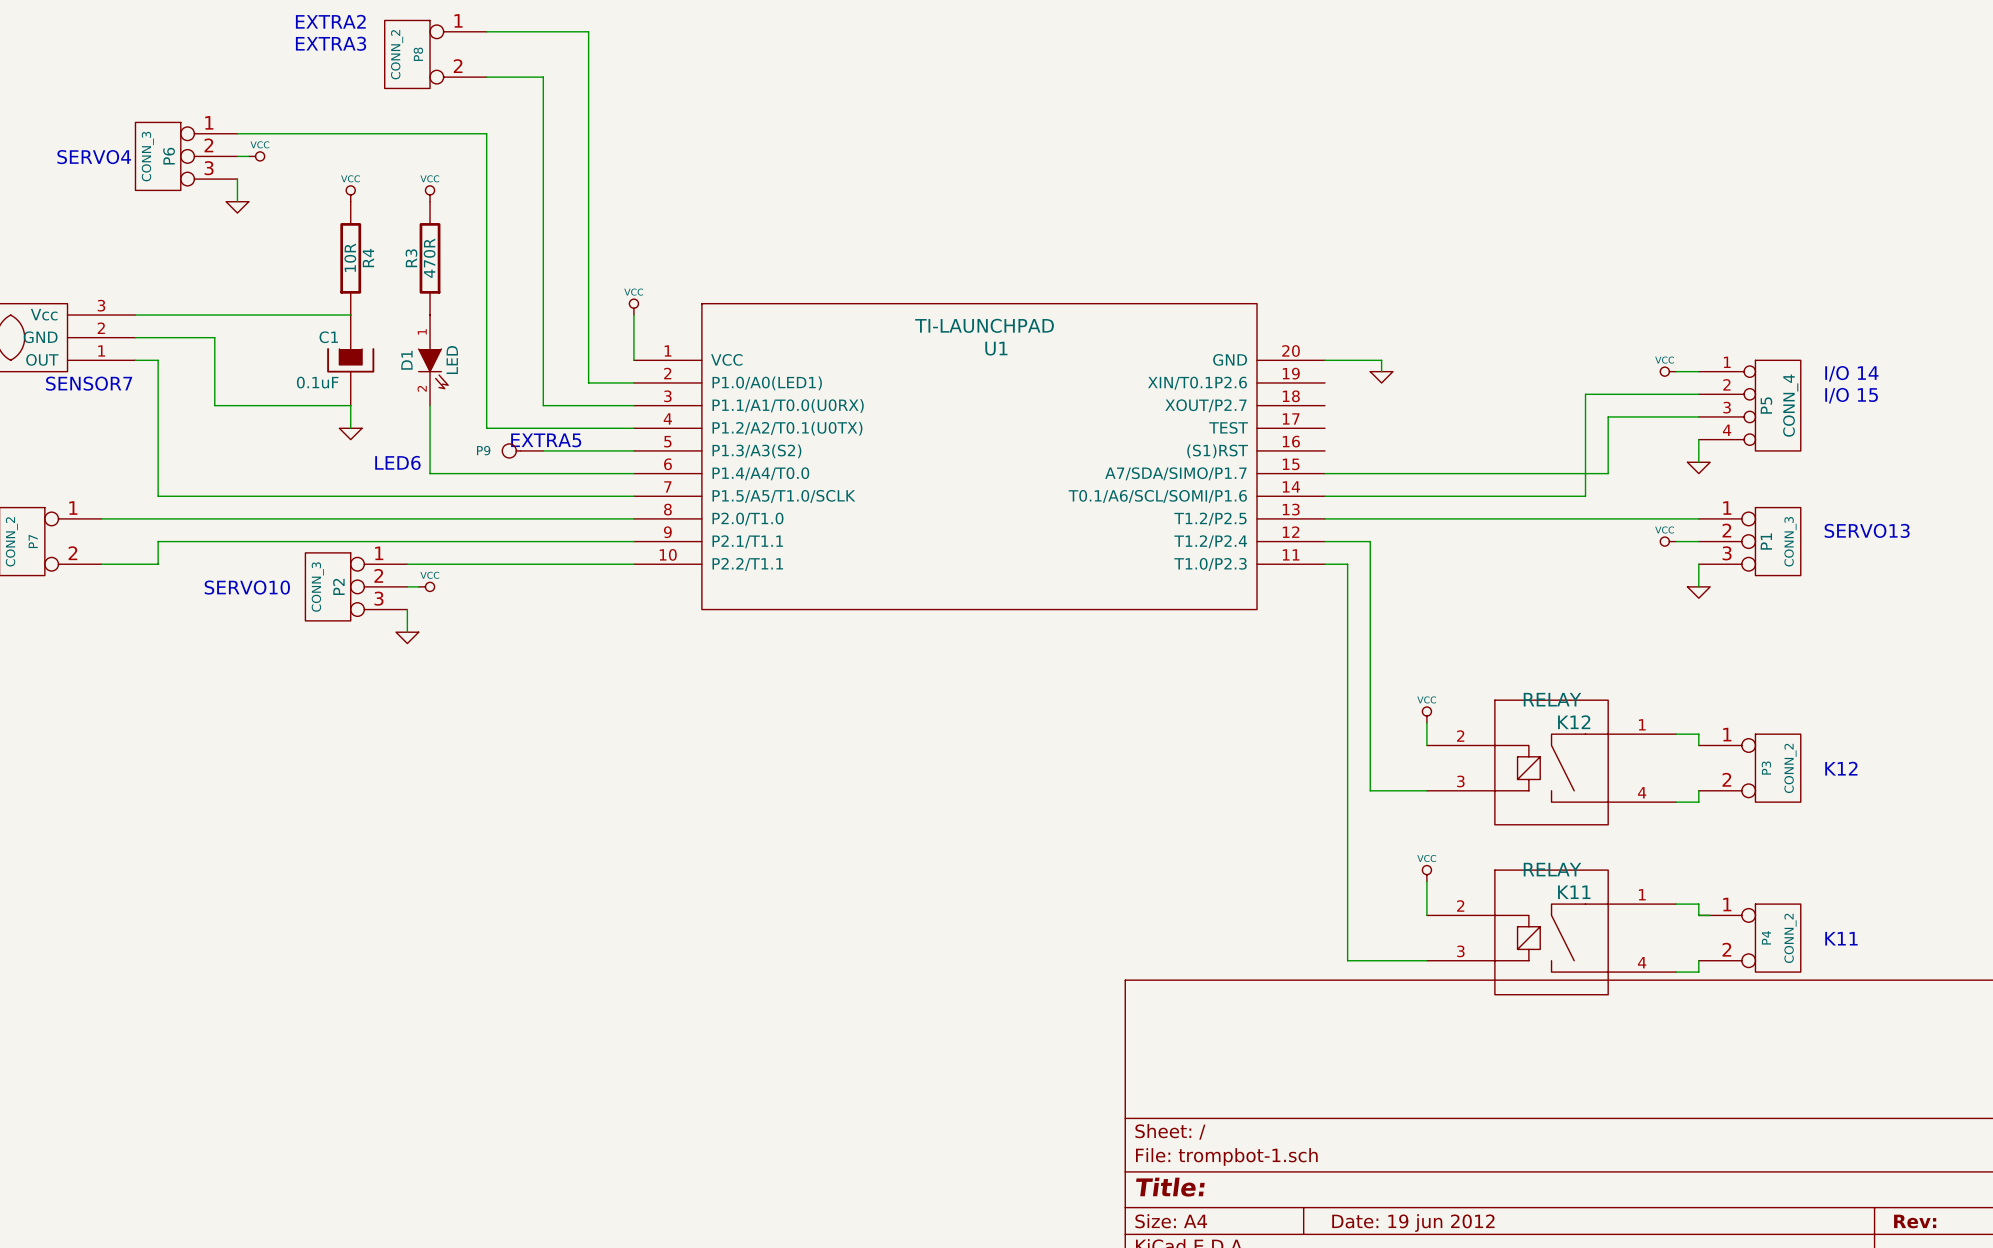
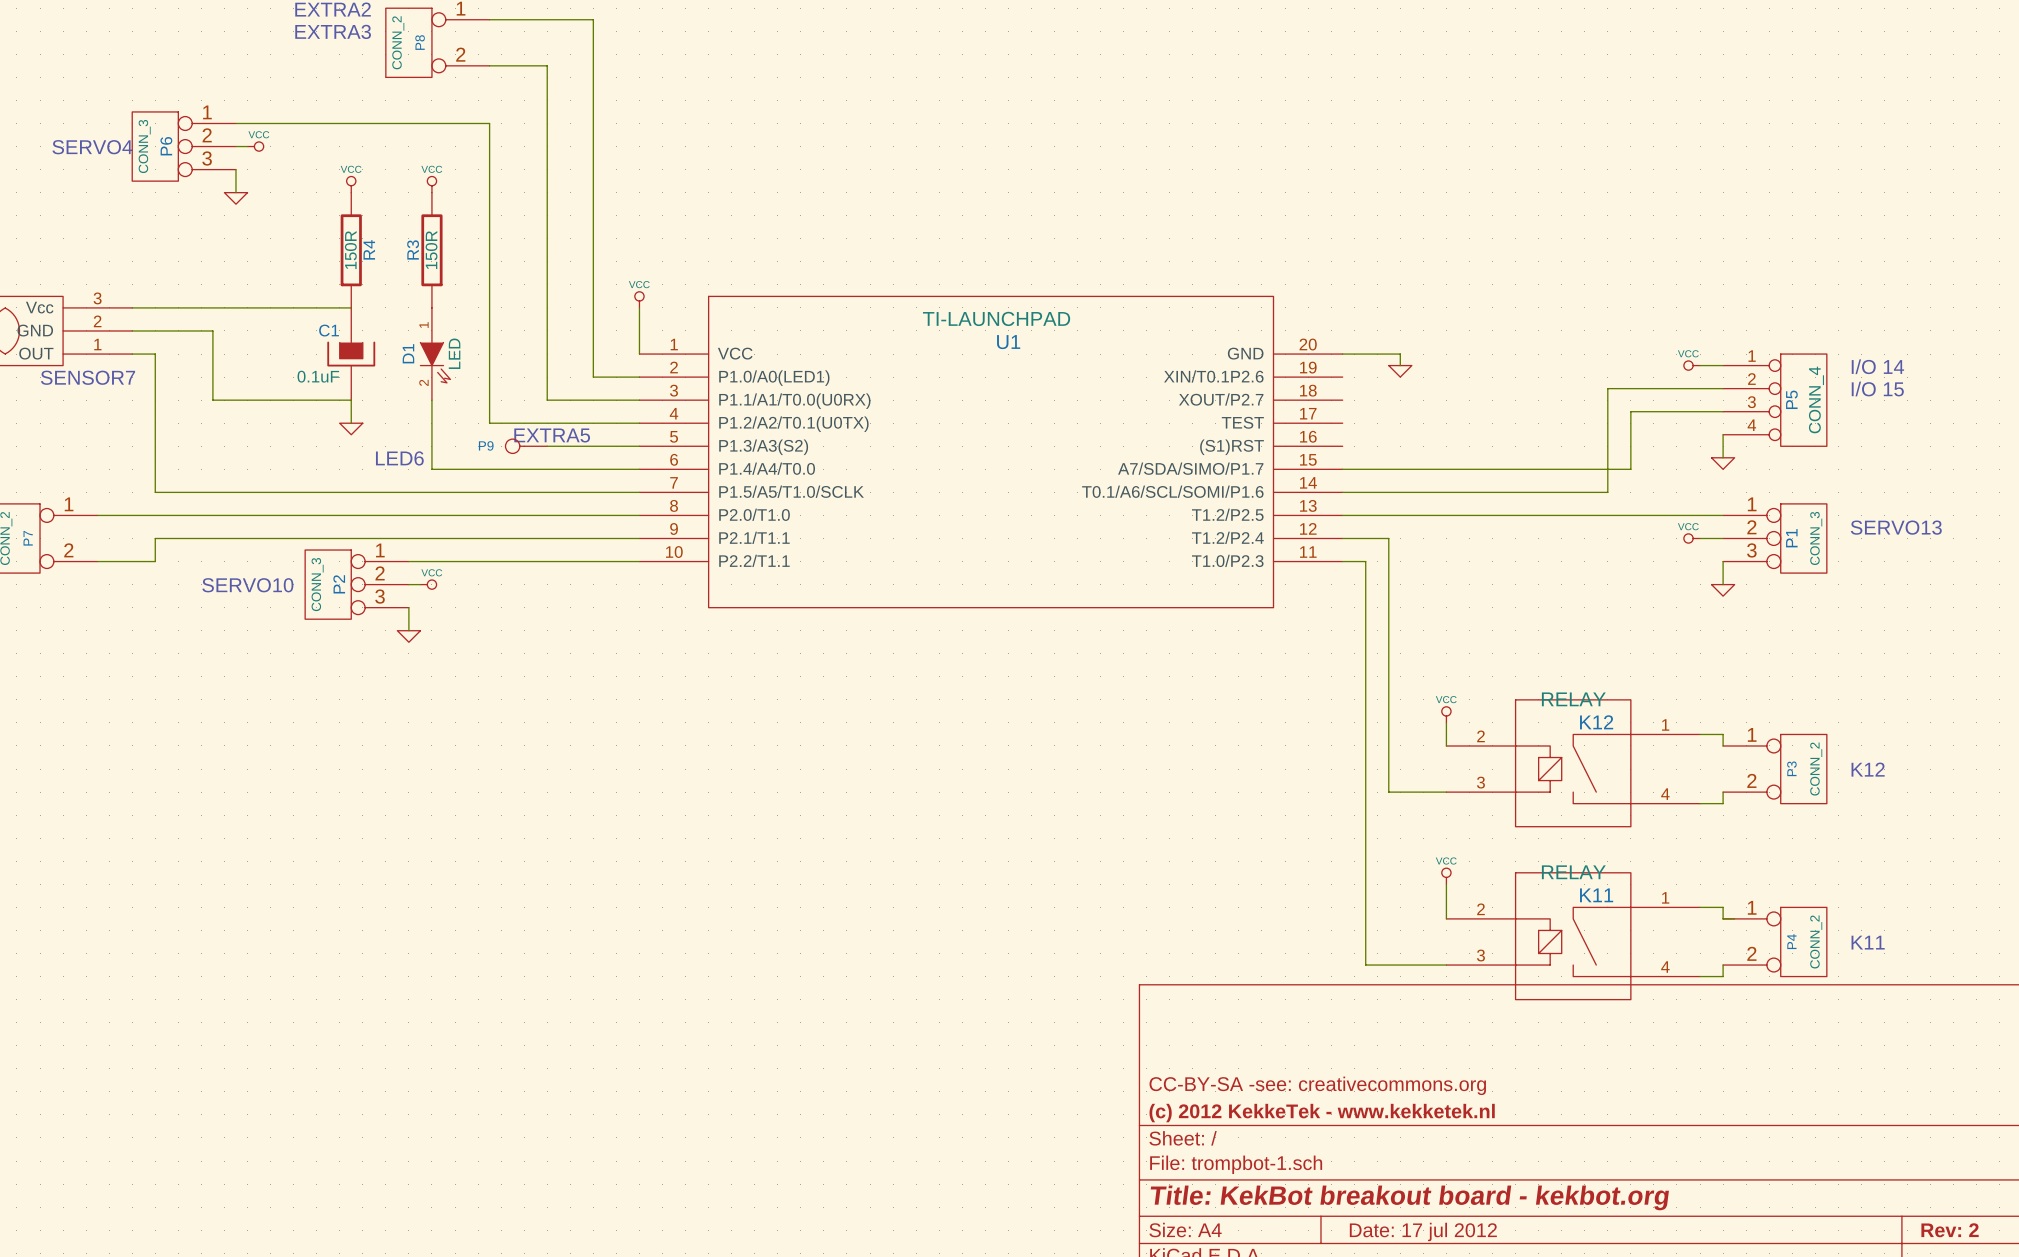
R4 value: 10R (350, 257) -> 150R (350, 250)
R3 value: 470R (429, 258) -> 150R (431, 250)
title block: none -> CC-BY-SA -see: creativecommons.org (1317, 1085)
title block: none -> (c) 2012 KekkeTek - www.kekketek.nl (1322, 1113)
title block: Title: (1170, 1187) -> Title: KekBot breakout board - kekbot.org (1409, 1197)
title block: Rev: (1915, 1221) -> Rev: 2 (1950, 1230)
title block: Date: 19 jun 2012 (1413, 1223) -> Date: 17 jul 2012 (1423, 1231)

